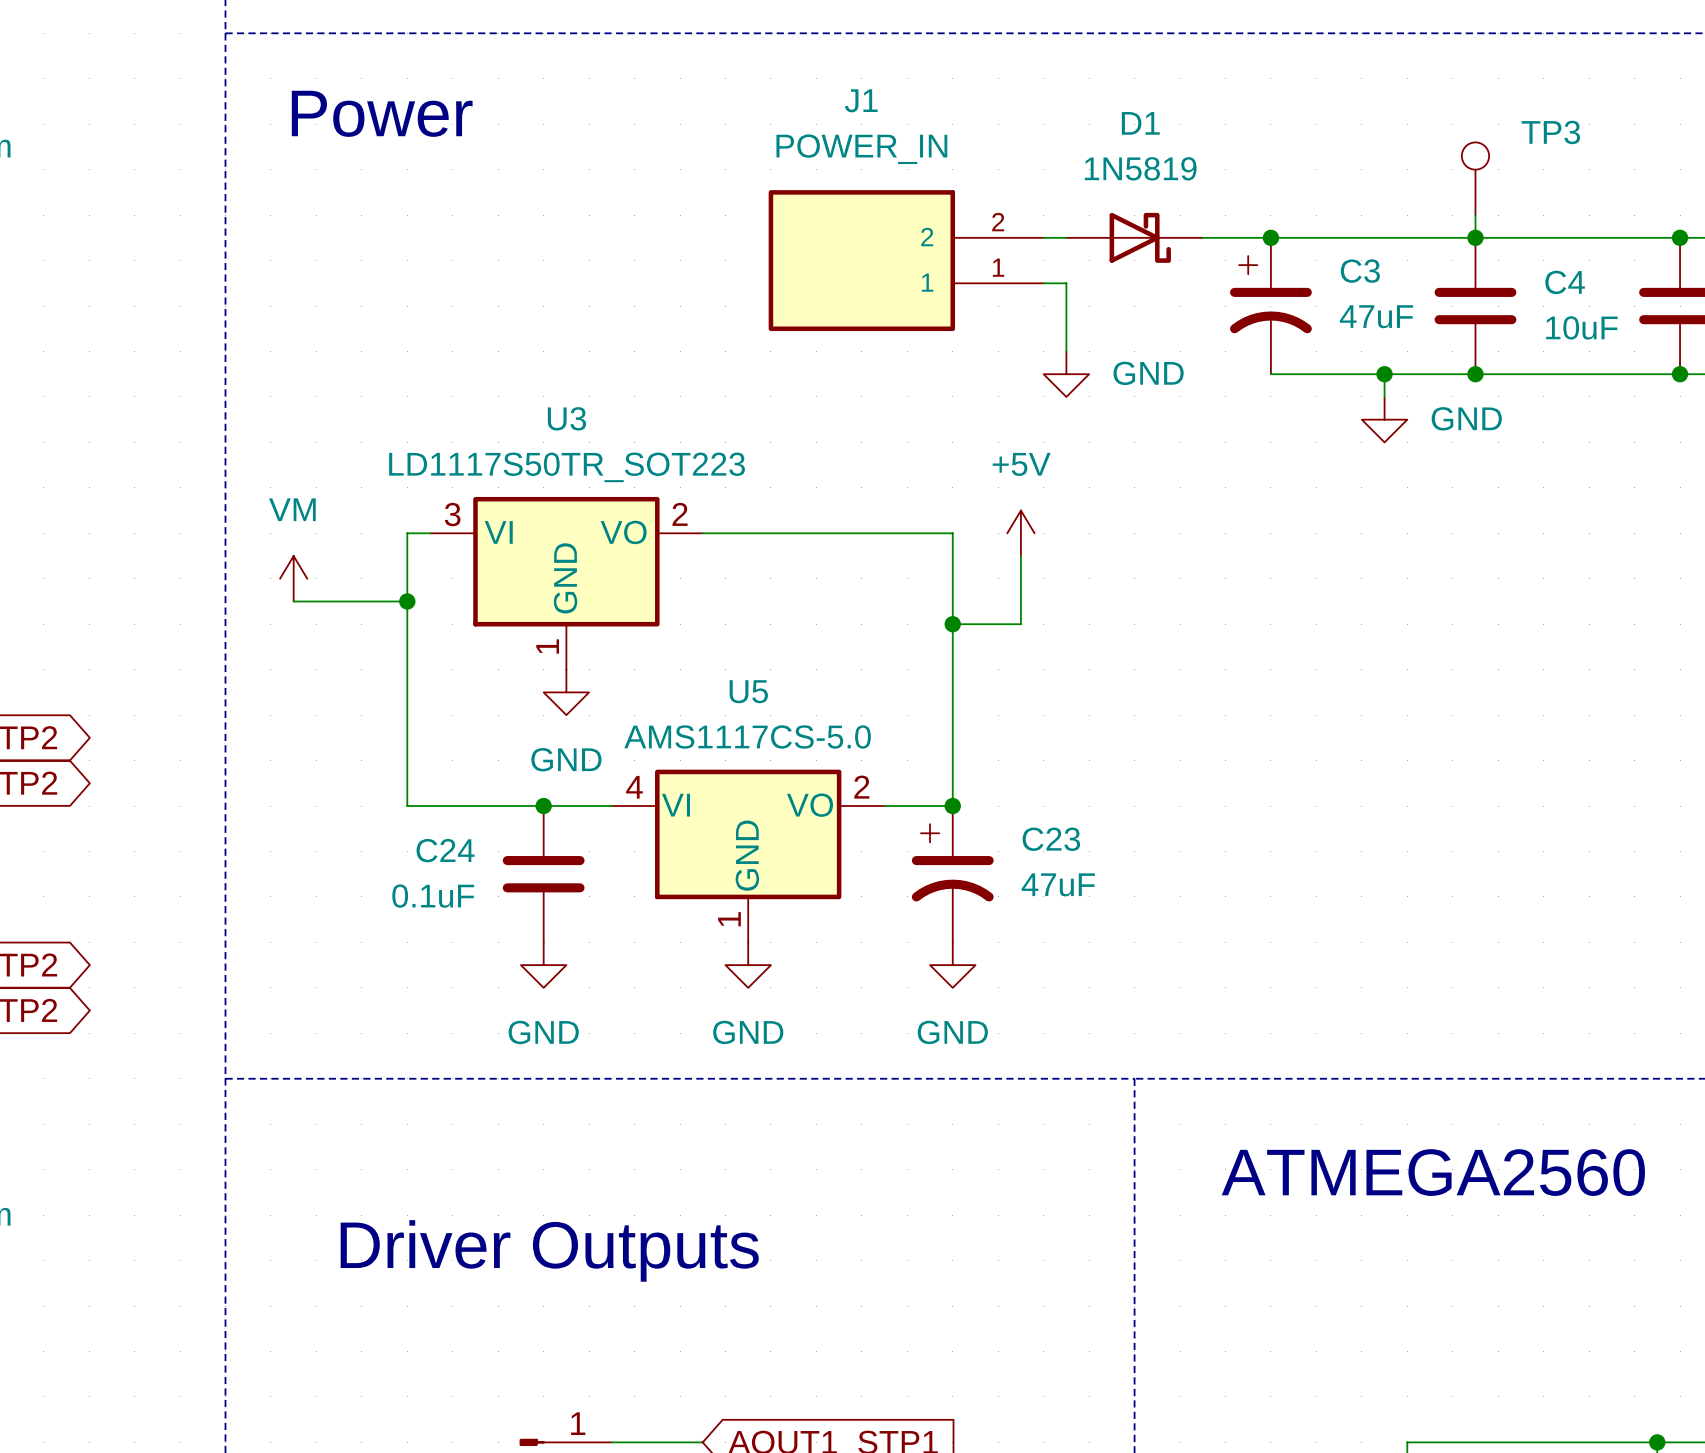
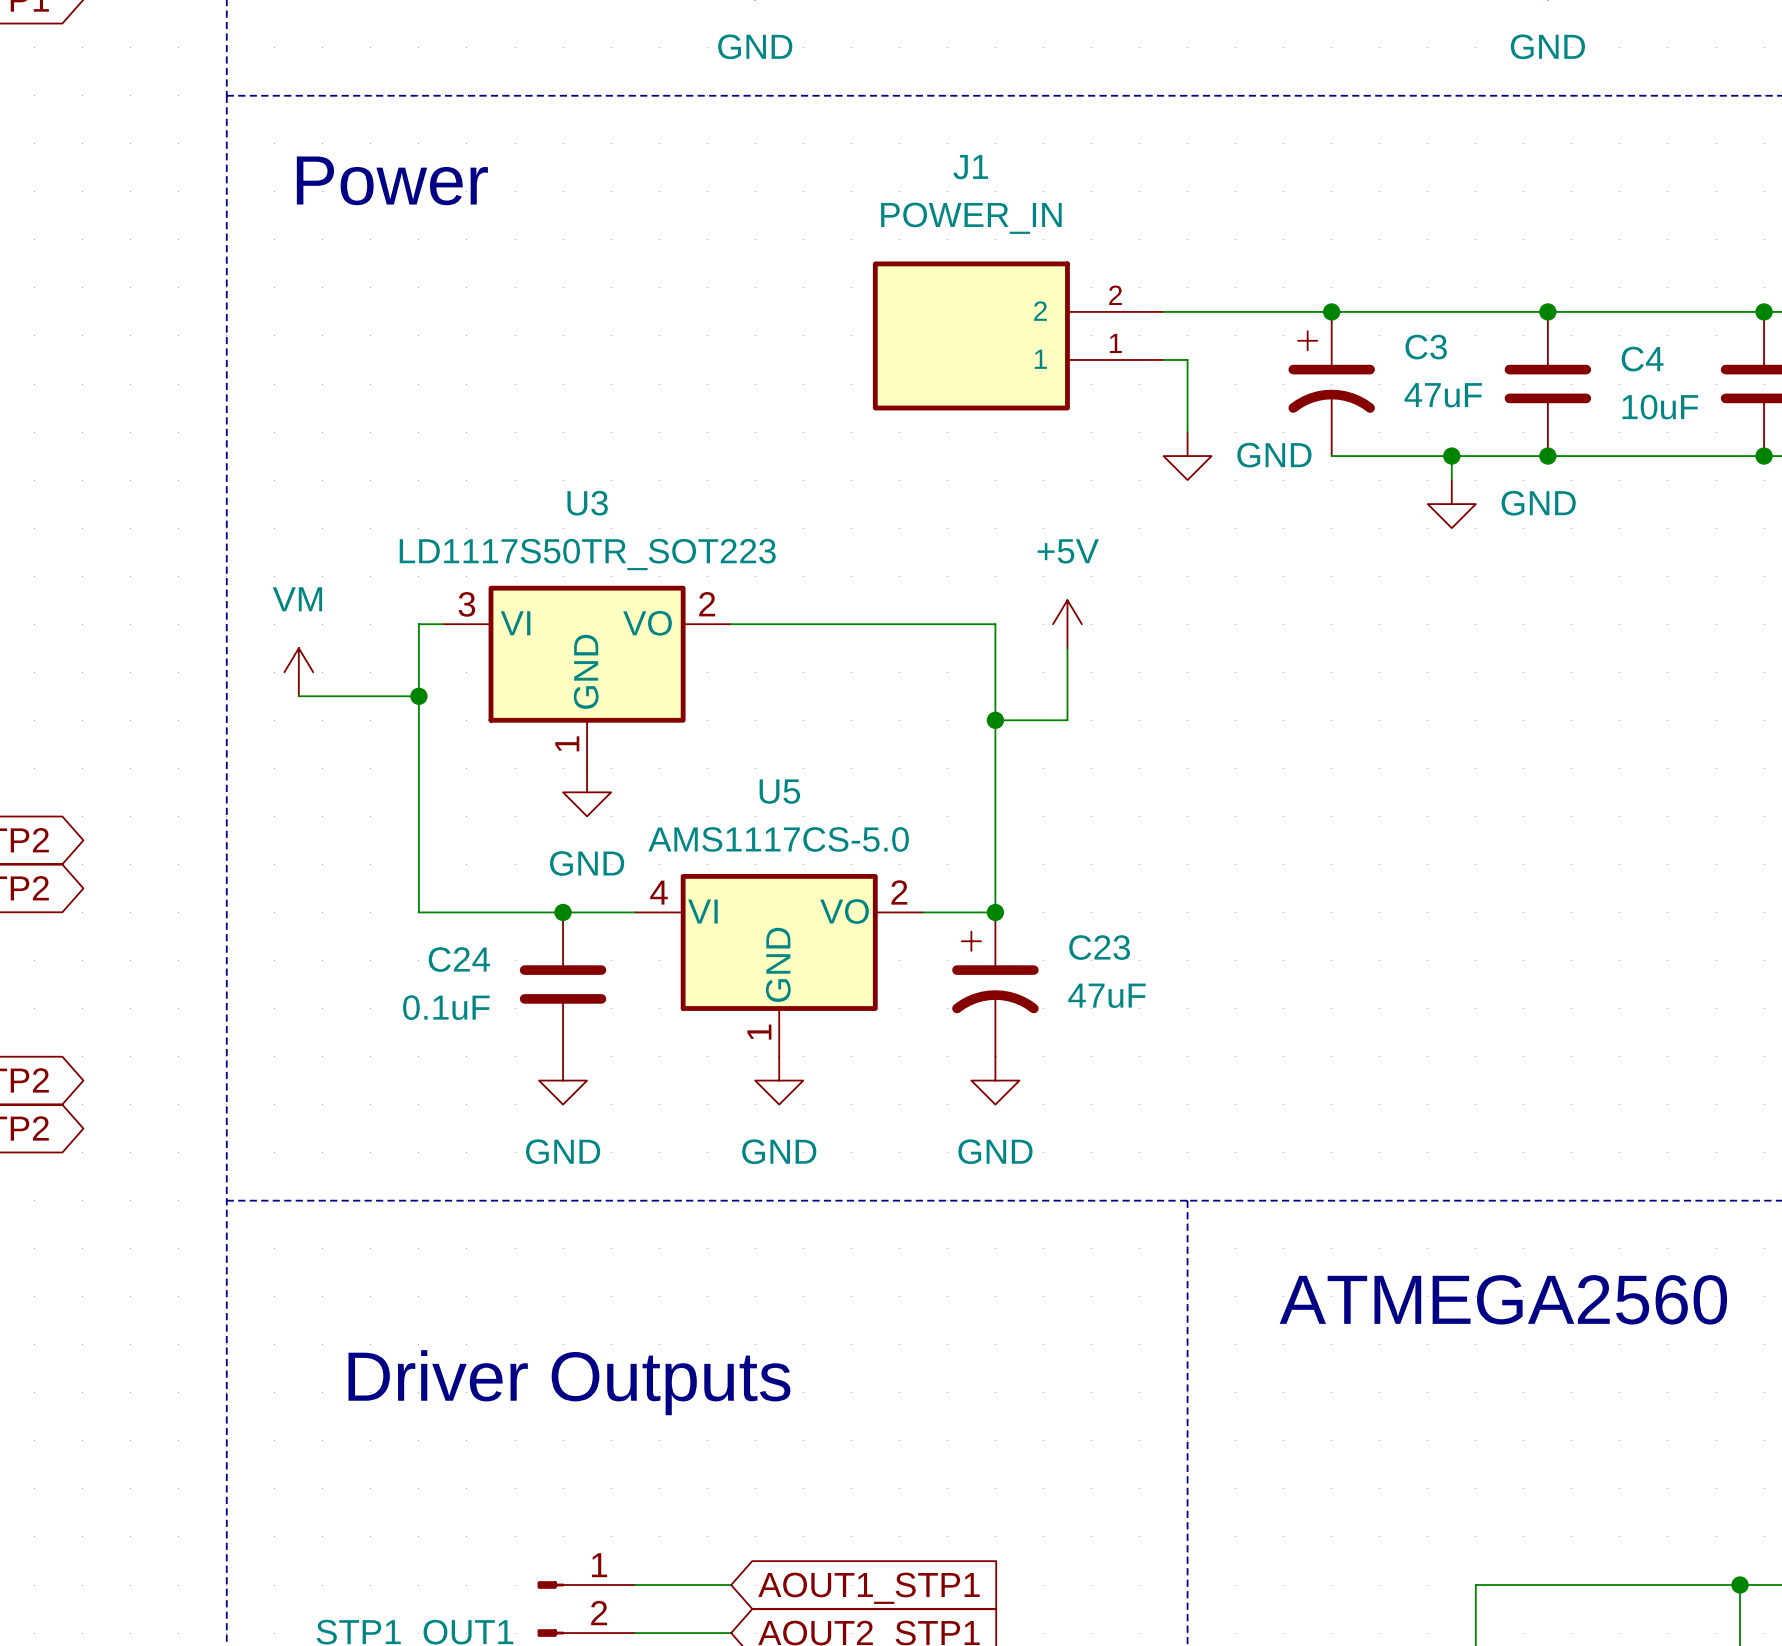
TP3: (1475, 178) -> none
wire: (1475, 215) (1475, 237) -> none
D1: 1N5819 (1134, 237) -> none
J1 position: (906, 260) -> (1018, 335)
wire: (1043, 283) (1066, 283) (1066, 351) -> (1163, 359) (1187, 359) (1187, 432)
power symbol position: GND (1066, 374) -> GND (1187, 456)

